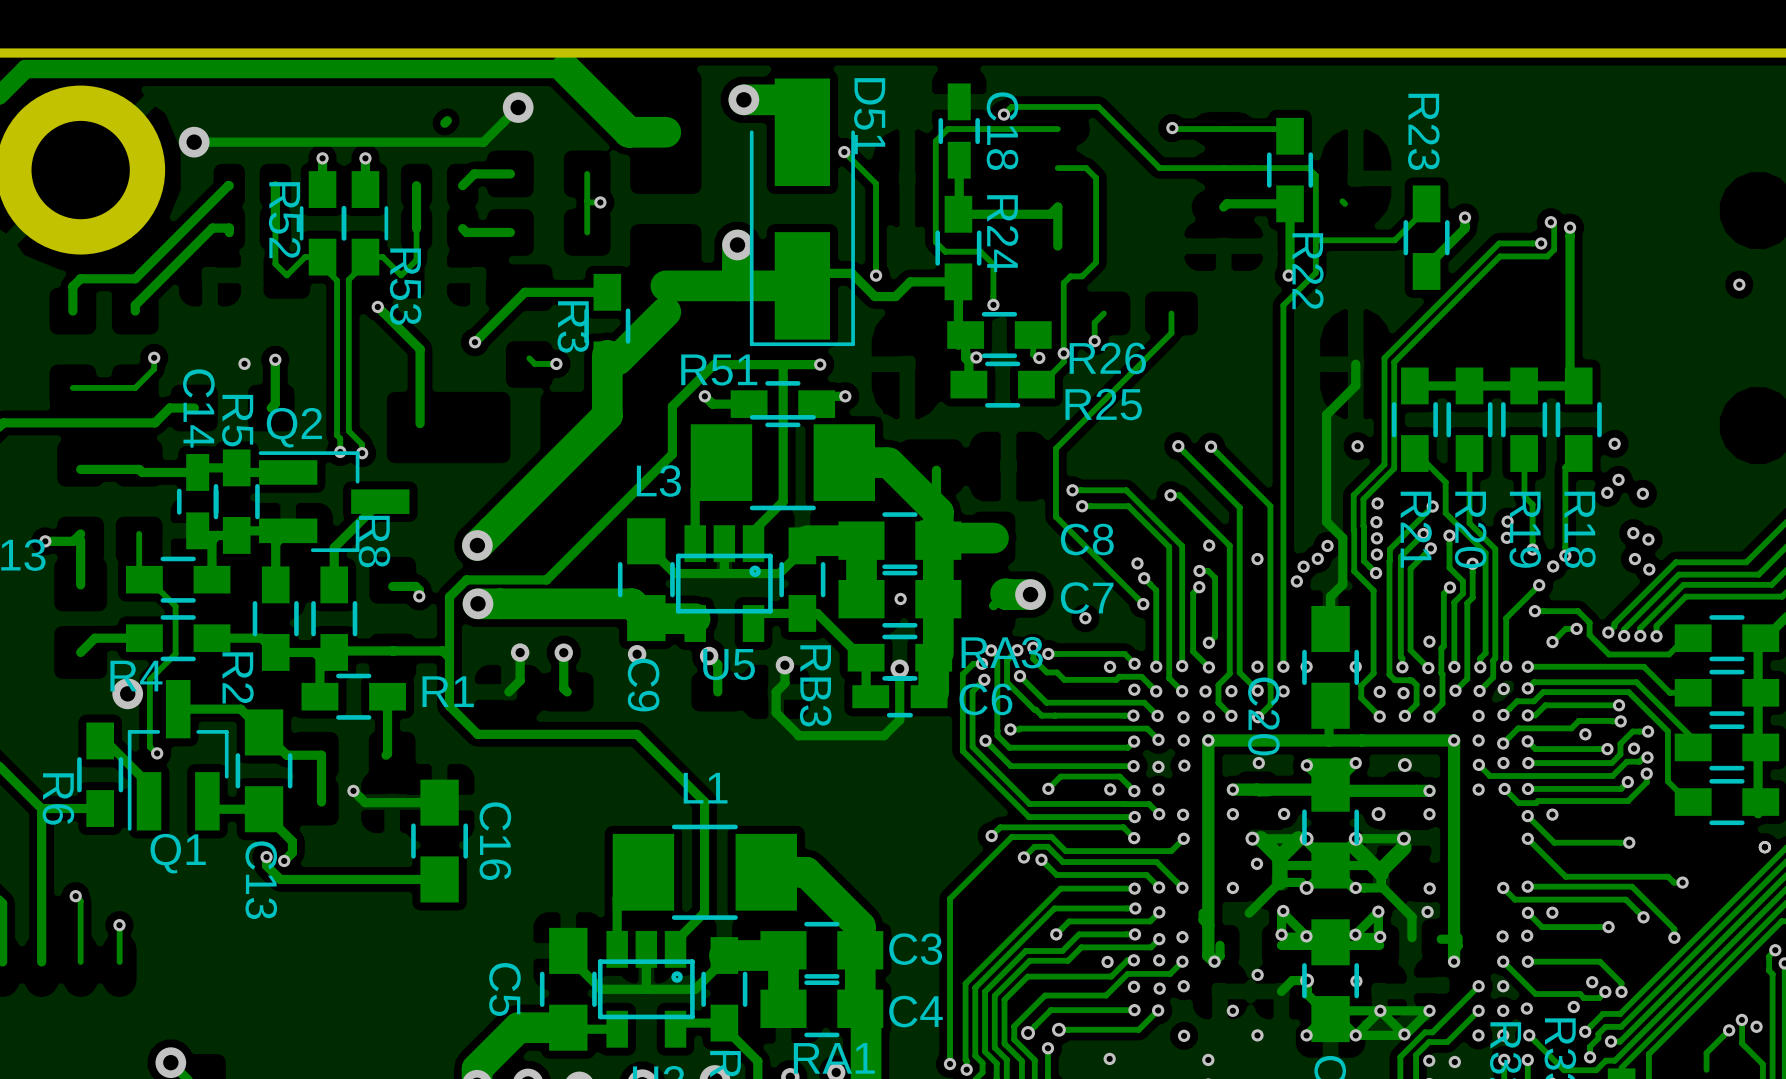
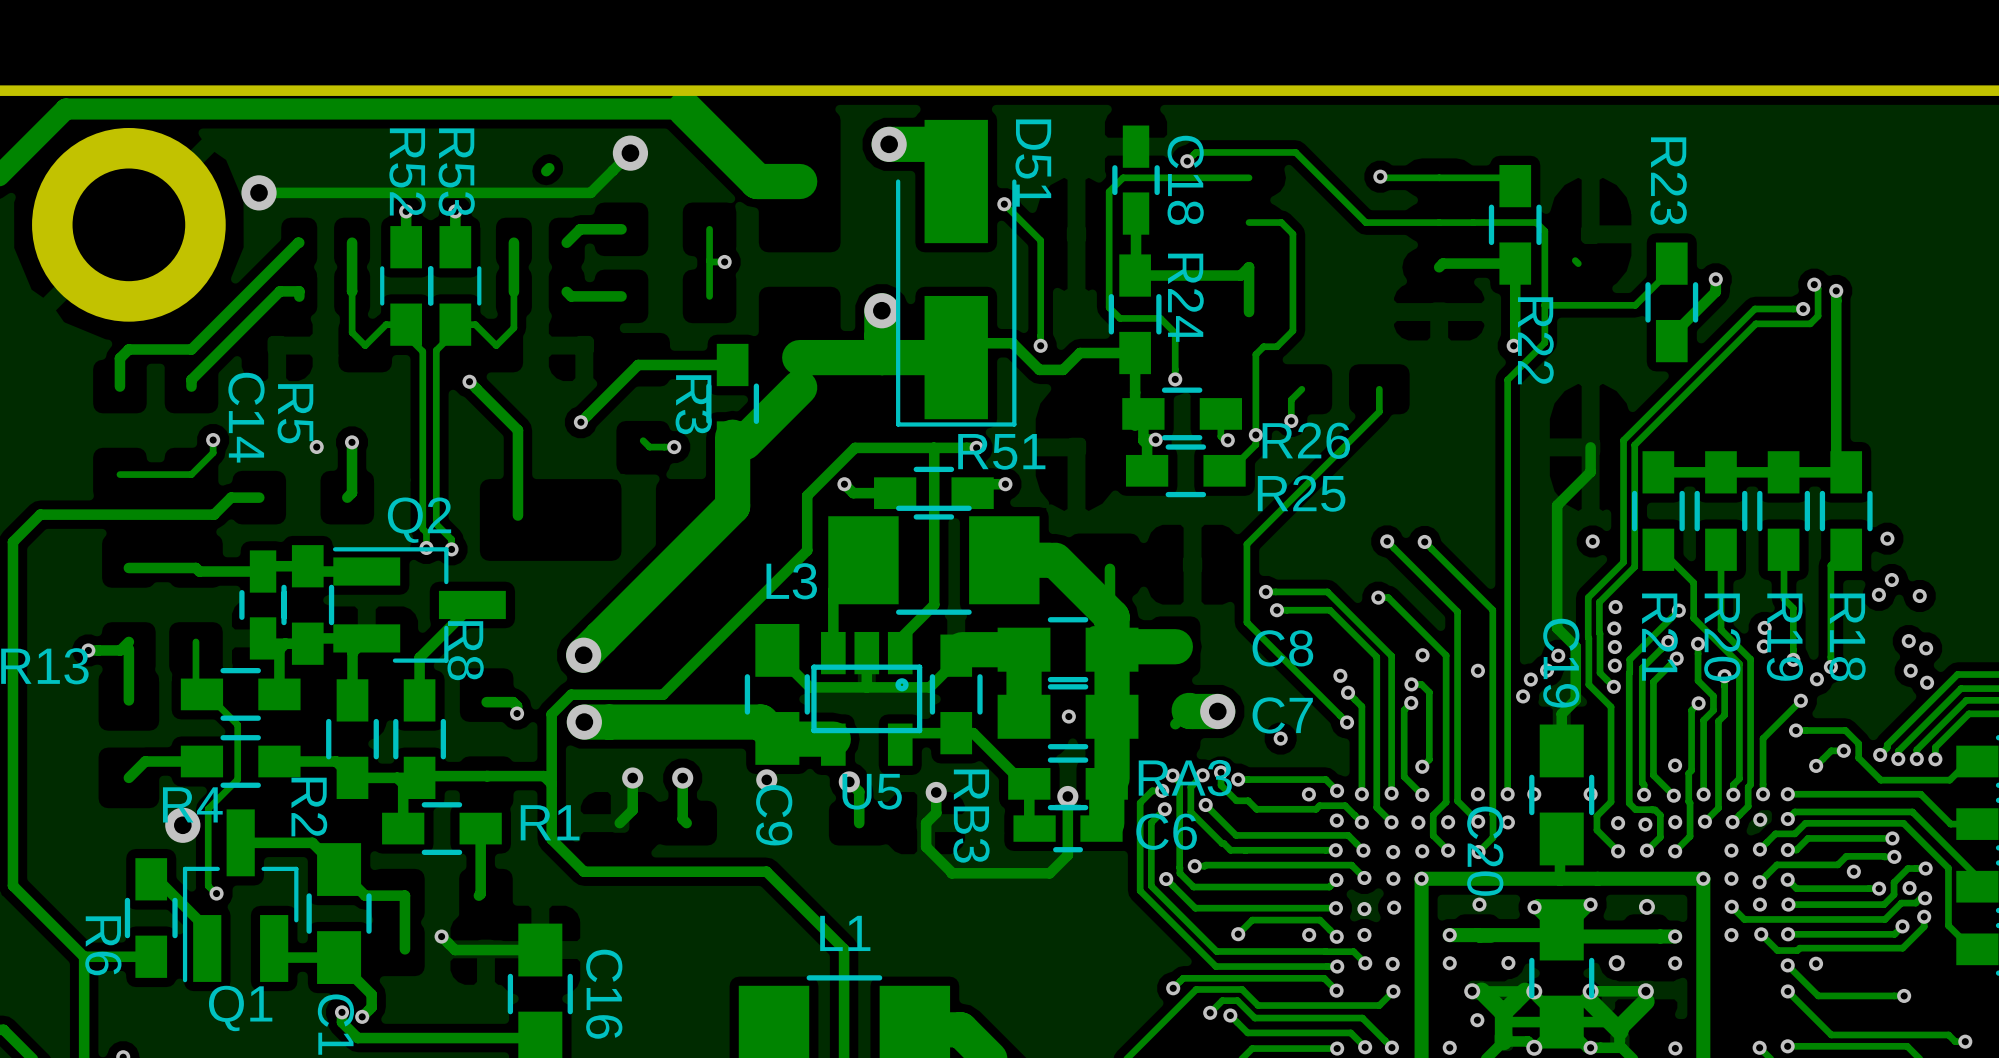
R52 name position: R52 (284, 220) -> R52 (407, 171)
R53 name position: R53 (405, 286) -> R53 (456, 172)
R51 name position: R51 (719, 370) -> R51 (1001, 451)
C14 name position: C14 (198, 408) -> C14 (246, 417)
R5 name position: R5 (237, 420) -> R5 (295, 413)
Q2 name position: Q2 (294, 427) -> Q2 (419, 520)
C19 name: none -> C19 (1561, 663)

